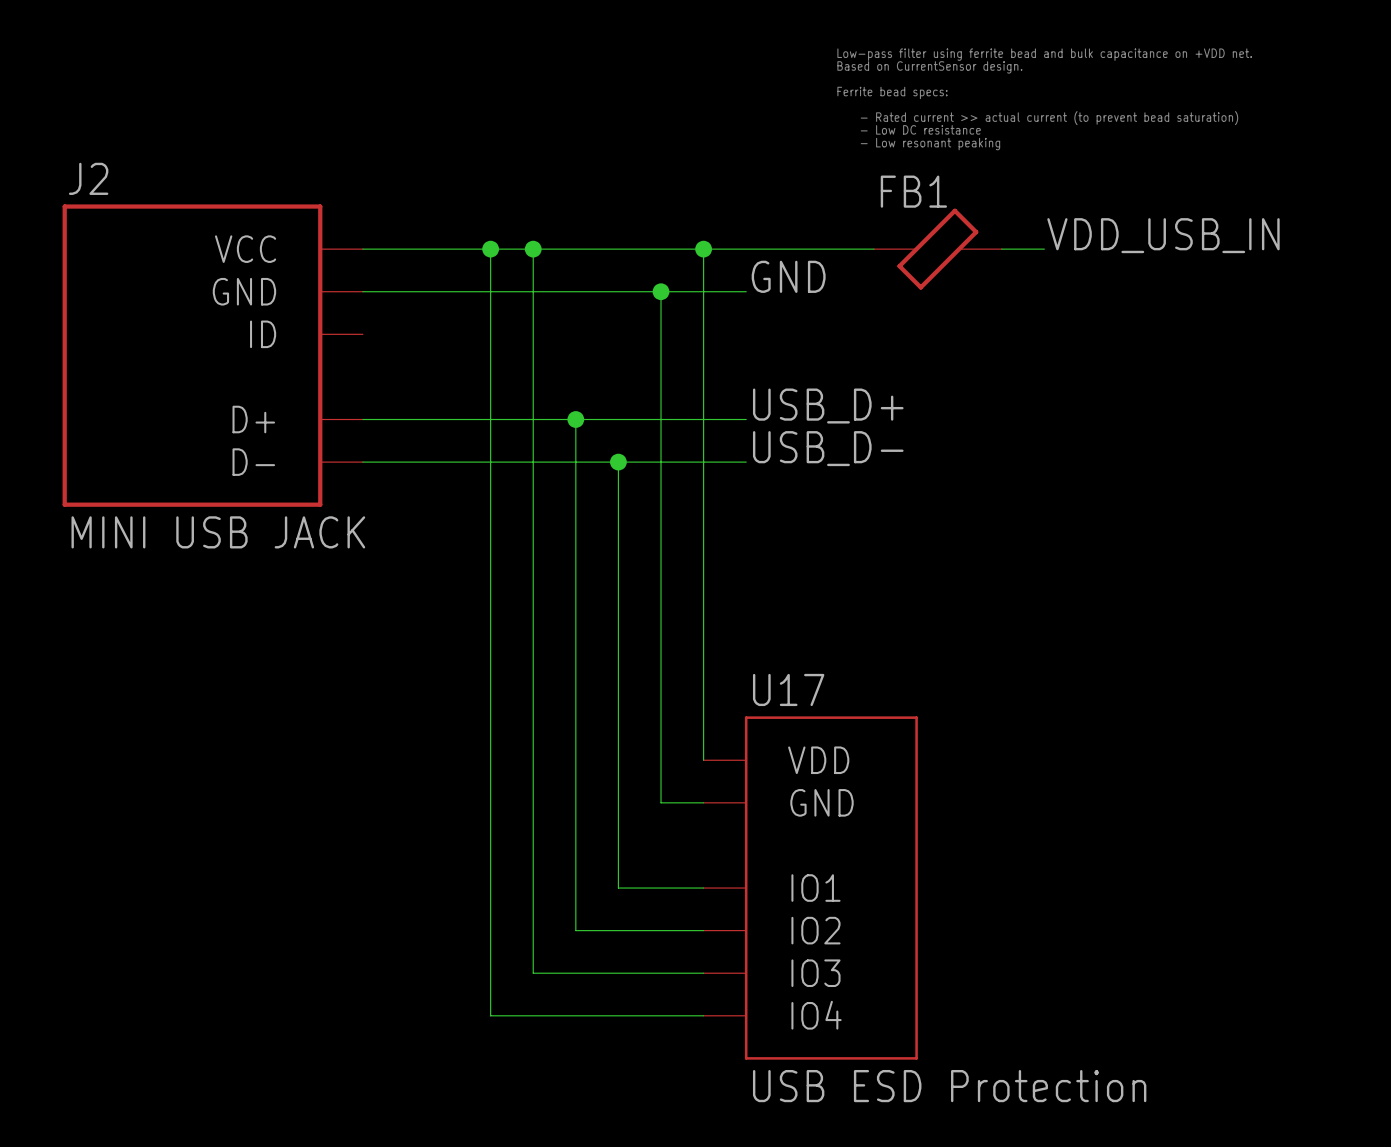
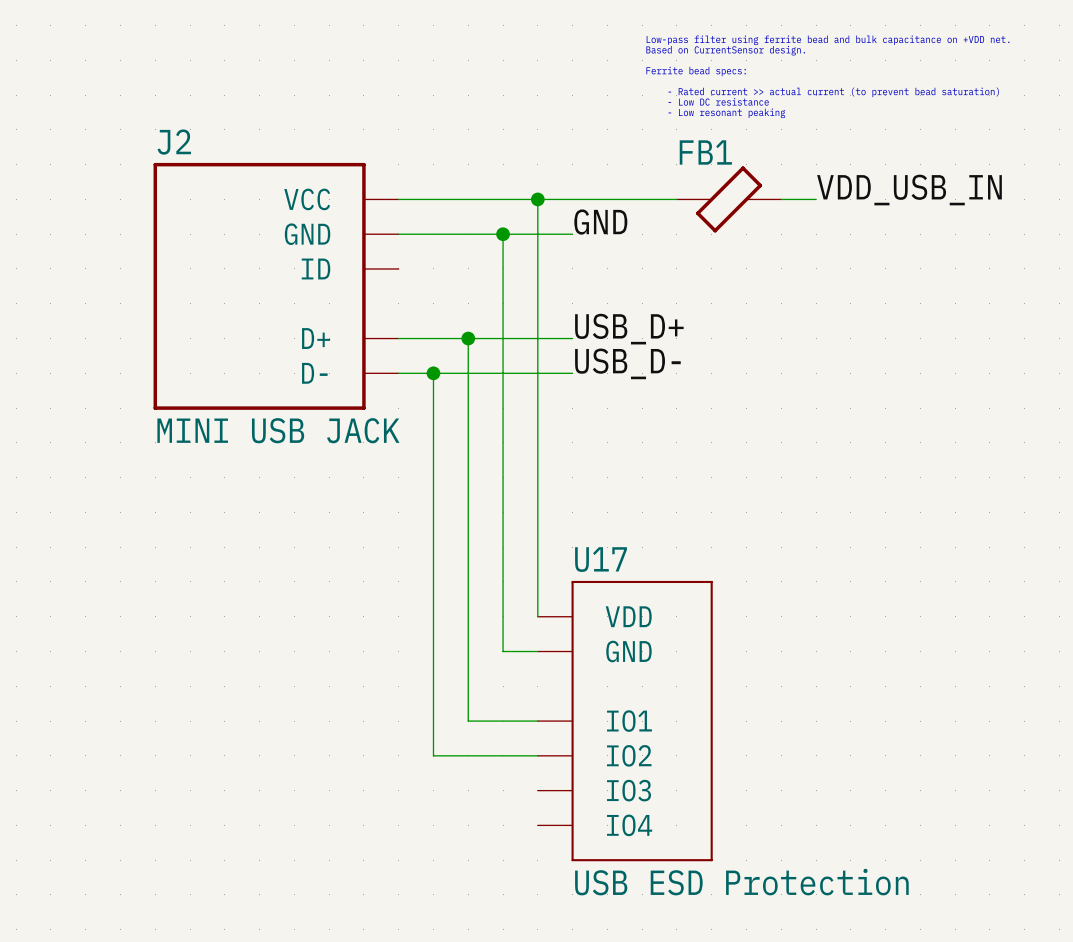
wire: (362, 249) (533, 249) (533, 973) (703, 973) -> none
wire: (490, 249) (490, 1015) (703, 1015) -> none
junction: (490, 249) -> none
junction: (533, 249) -> none
wire: (362, 291) (533, 291) -> none
J2 position: (212, 355) -> (276, 286)
wire: (362, 419) (533, 419) -> none
wire: (575, 419) (575, 462) -> (468, 338) (468, 373)
junction: (575, 419) -> none
junction: none -> (468, 338)
wire: (362, 462) (533, 462) -> none
junction: none -> (433, 373)
junction: (618, 462) -> none

